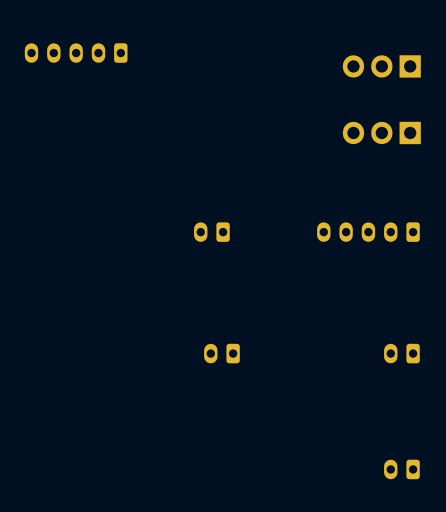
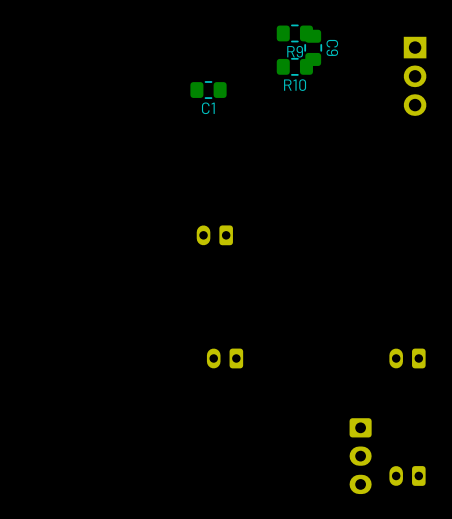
R9: none -> (294, 33)
C9: none -> (313, 47)
part: (76, 53) -> none
R10: none -> (294, 66)
part rotation: 0° (381, 66) -> 90° counterclockwise (415, 76)
C1: none -> (208, 90)
part: (381, 132) -> none
part: (368, 232) -> none
part: none -> (360, 456)

